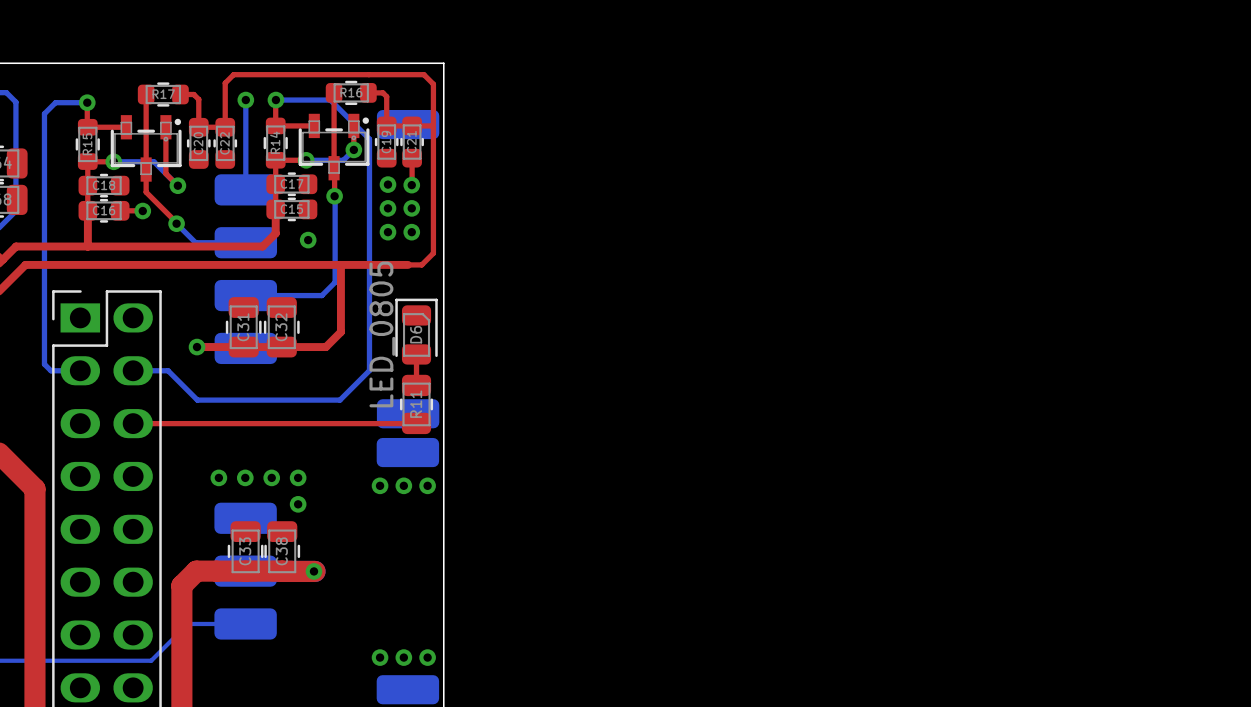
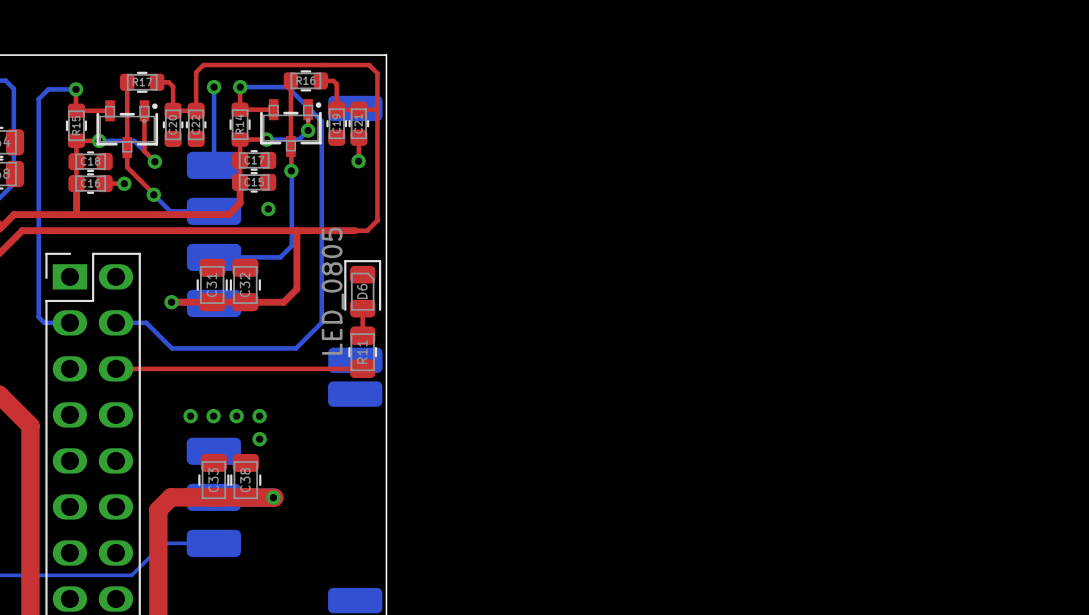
via: (387, 184) -> none
via: (387, 208) -> none
via: (411, 208) -> none
via: (387, 232) -> none
via: (411, 232) -> none
via: (380, 485) -> none
via: (403, 485) -> none
via: (427, 485) -> none
via: (380, 657) -> none
via: (403, 657) -> none
via: (427, 657) -> none

